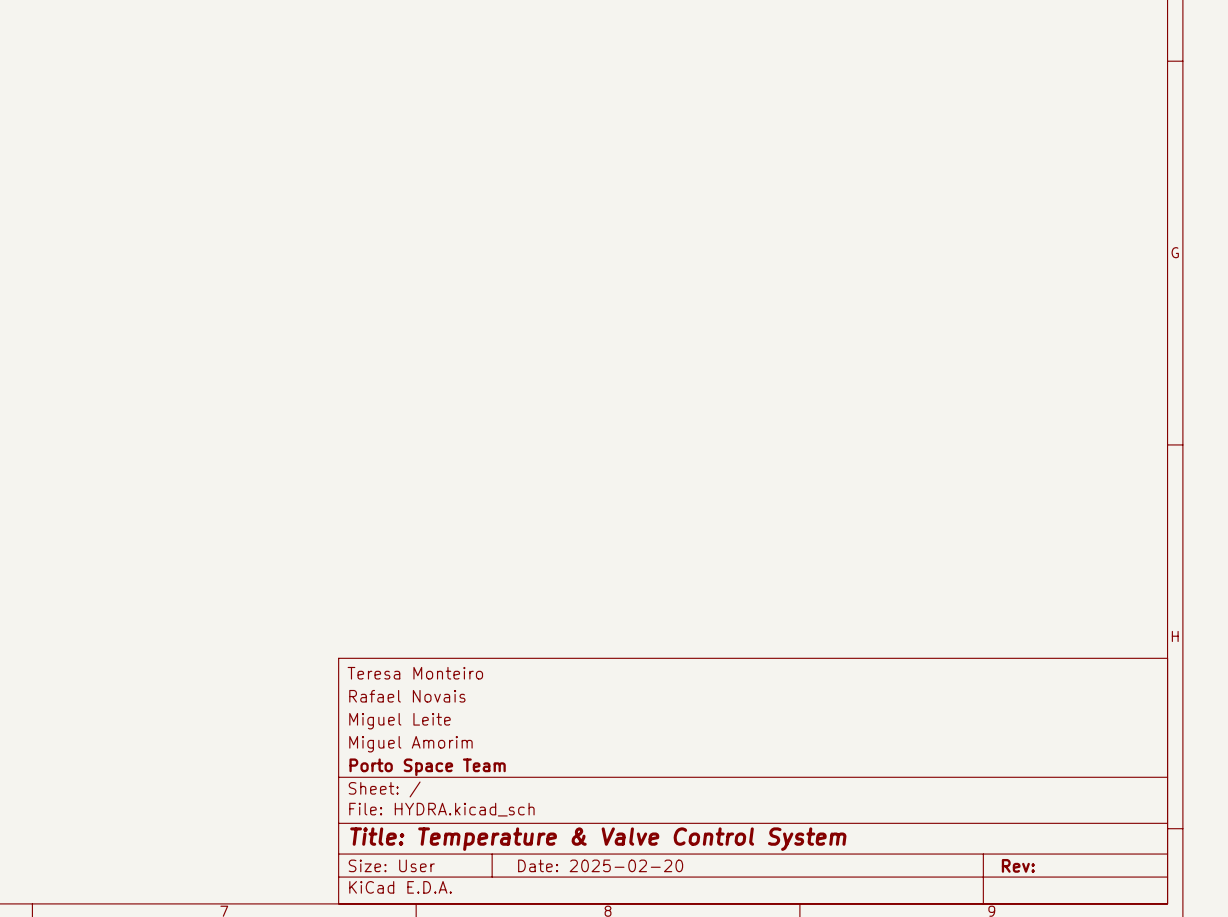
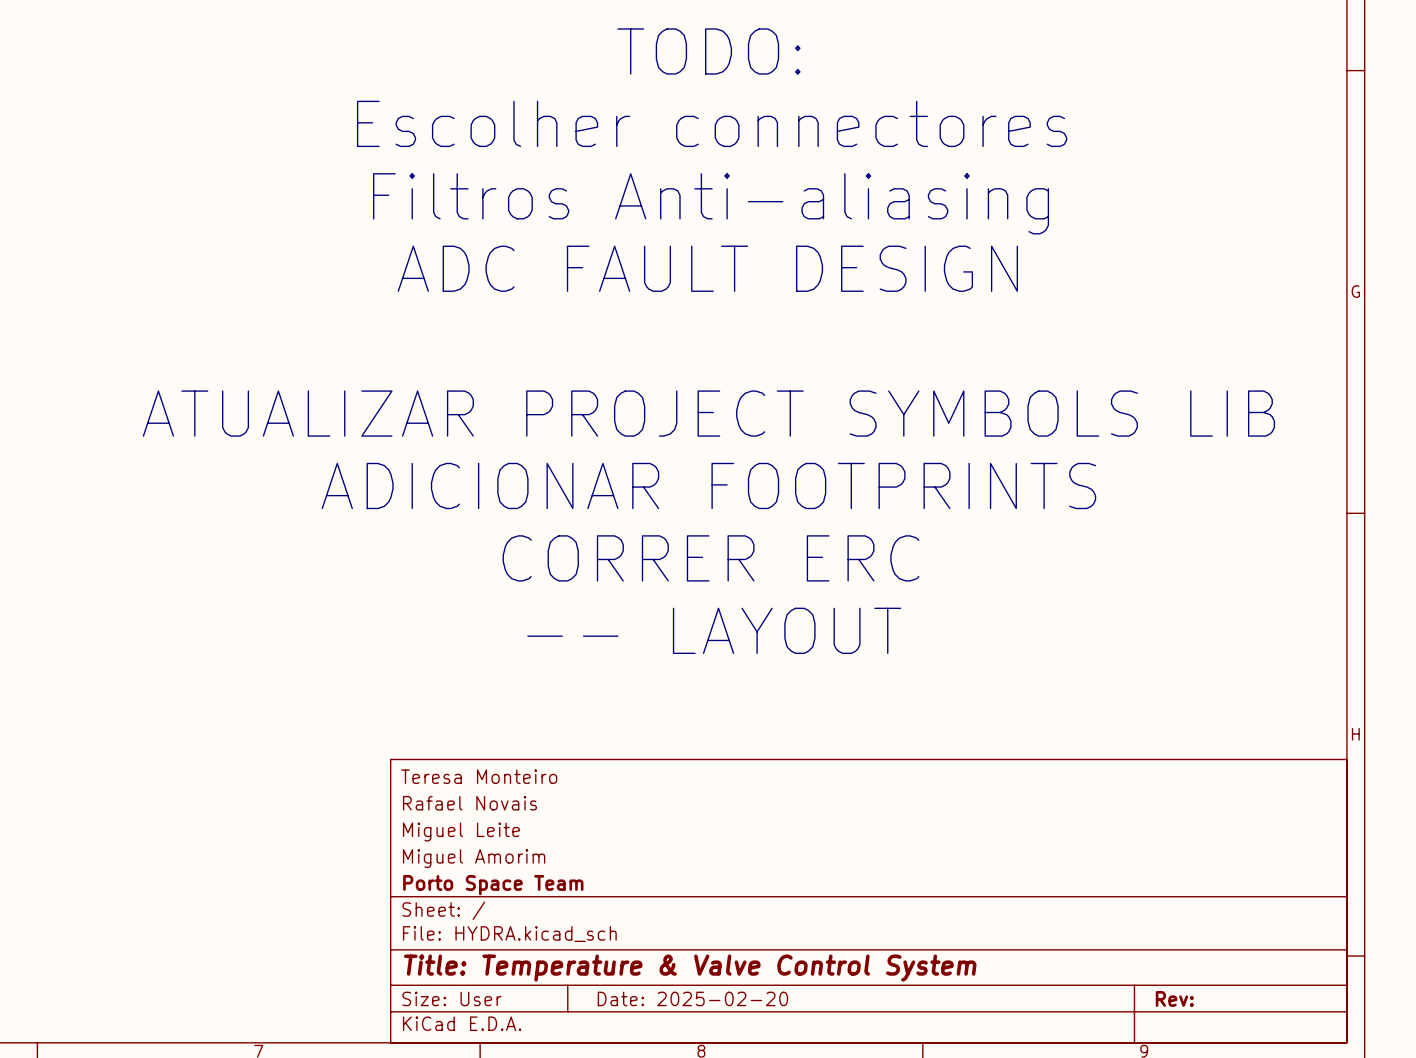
text: none -> TODO: (708, 51)
text: none -> Escolher connectores (712, 123)
text: none -> Filtros Anti-aliasing (711, 203)
text: none -> ADC FAULT DESIGN (707, 268)
text: none -> ATUALIZAR PROJECT SYMBOLS LIB (708, 413)
text: none -> ADICIONAR FOOTPRINTS (708, 485)
text: none -> CORRER ERC (711, 558)
text: none -> -- LAYOUT (714, 630)

